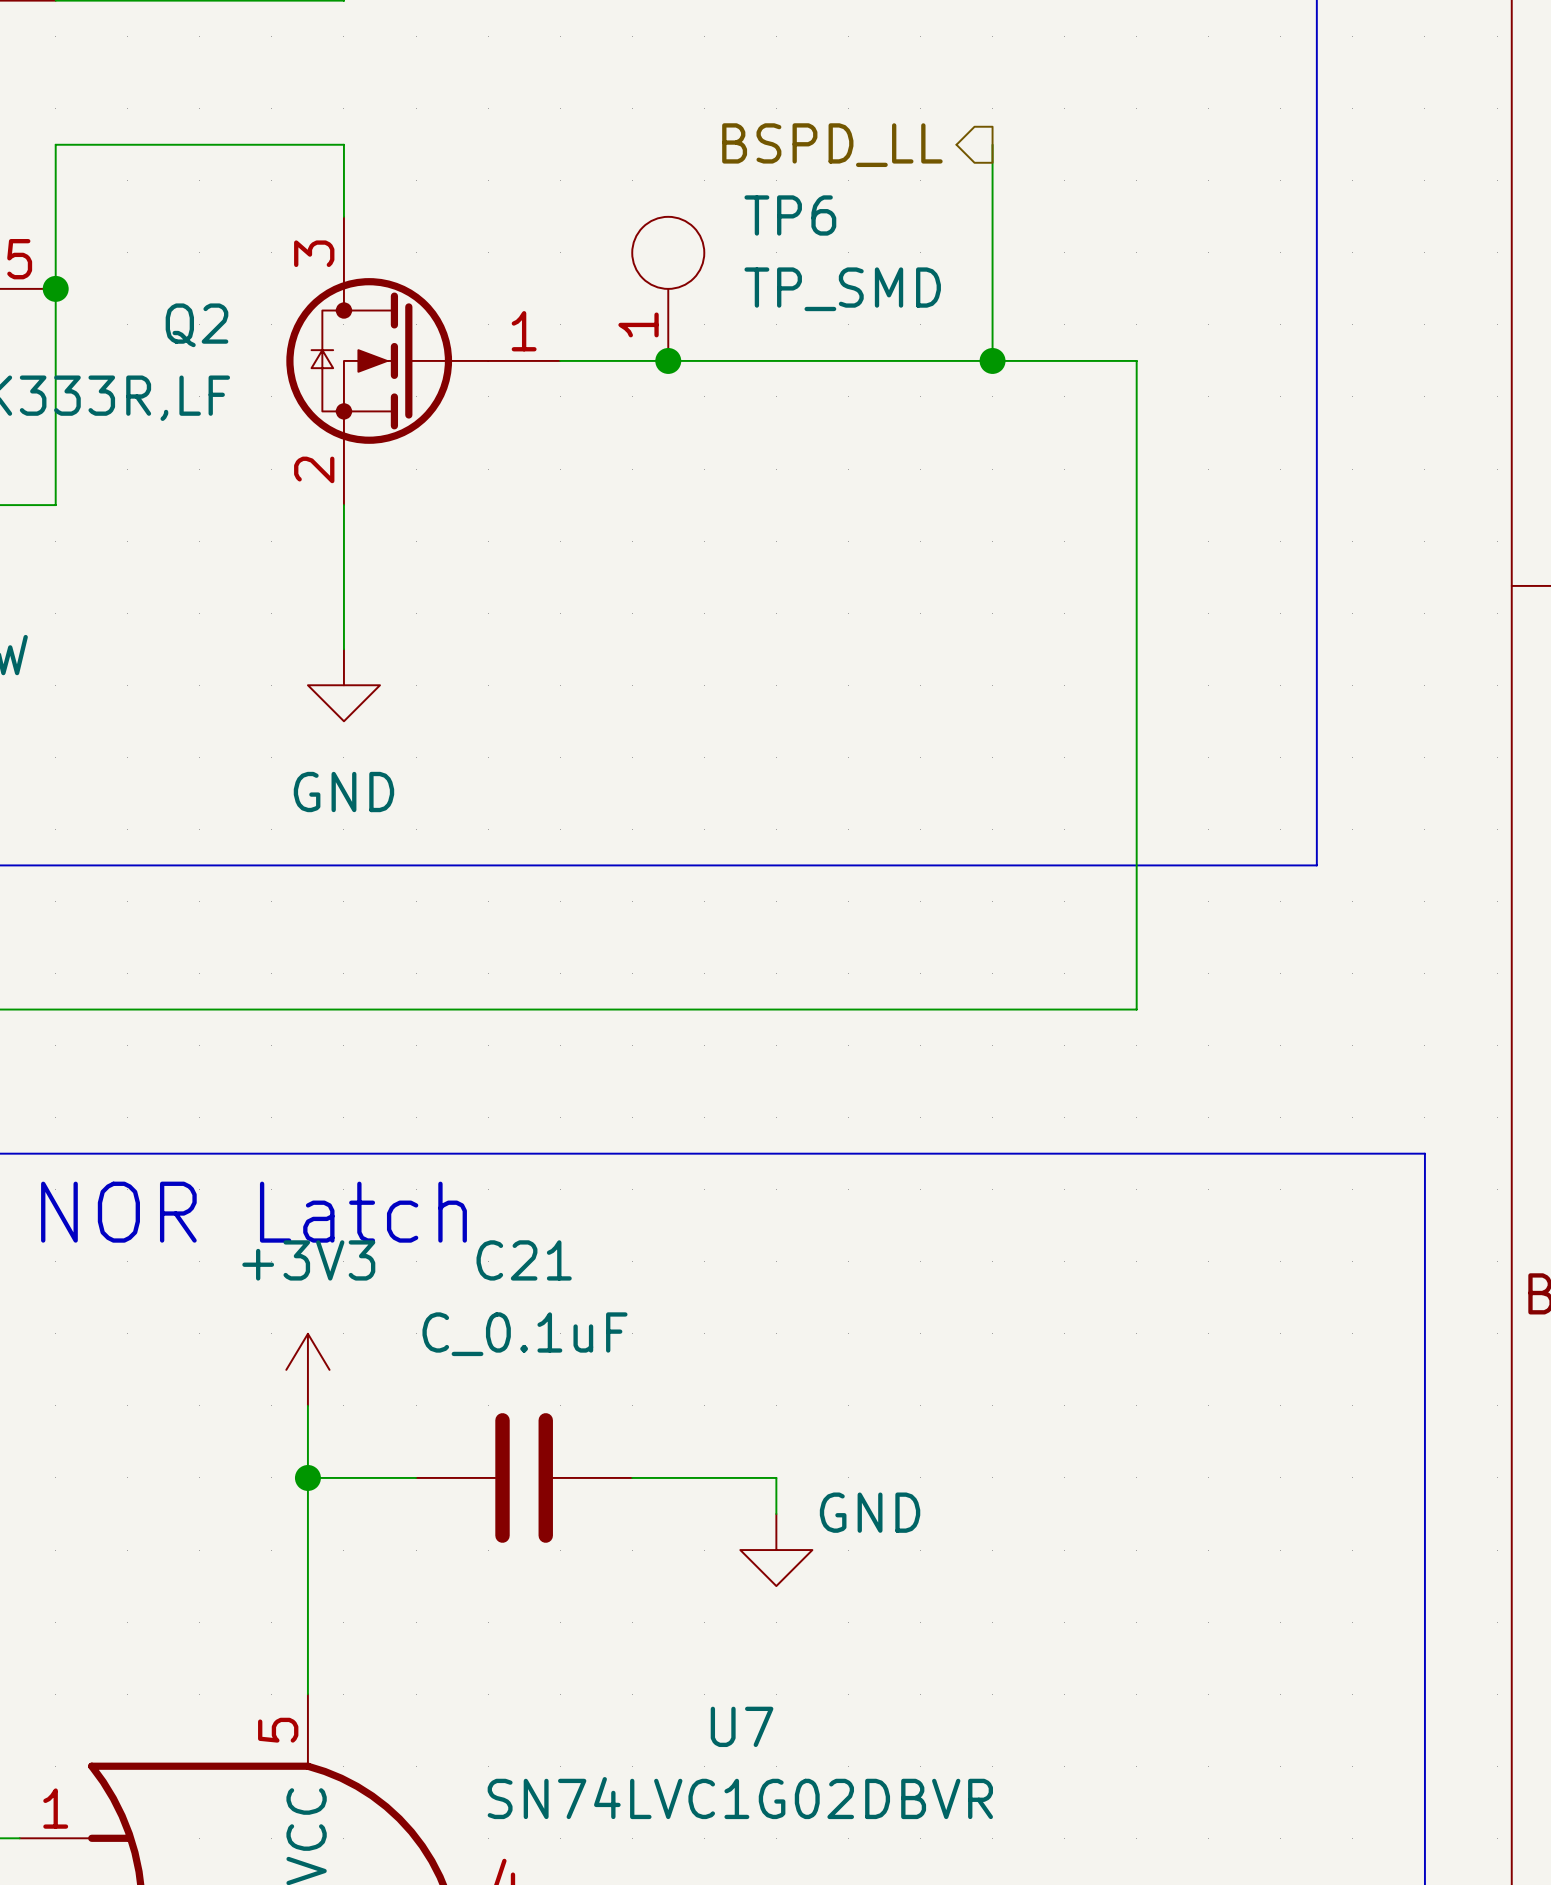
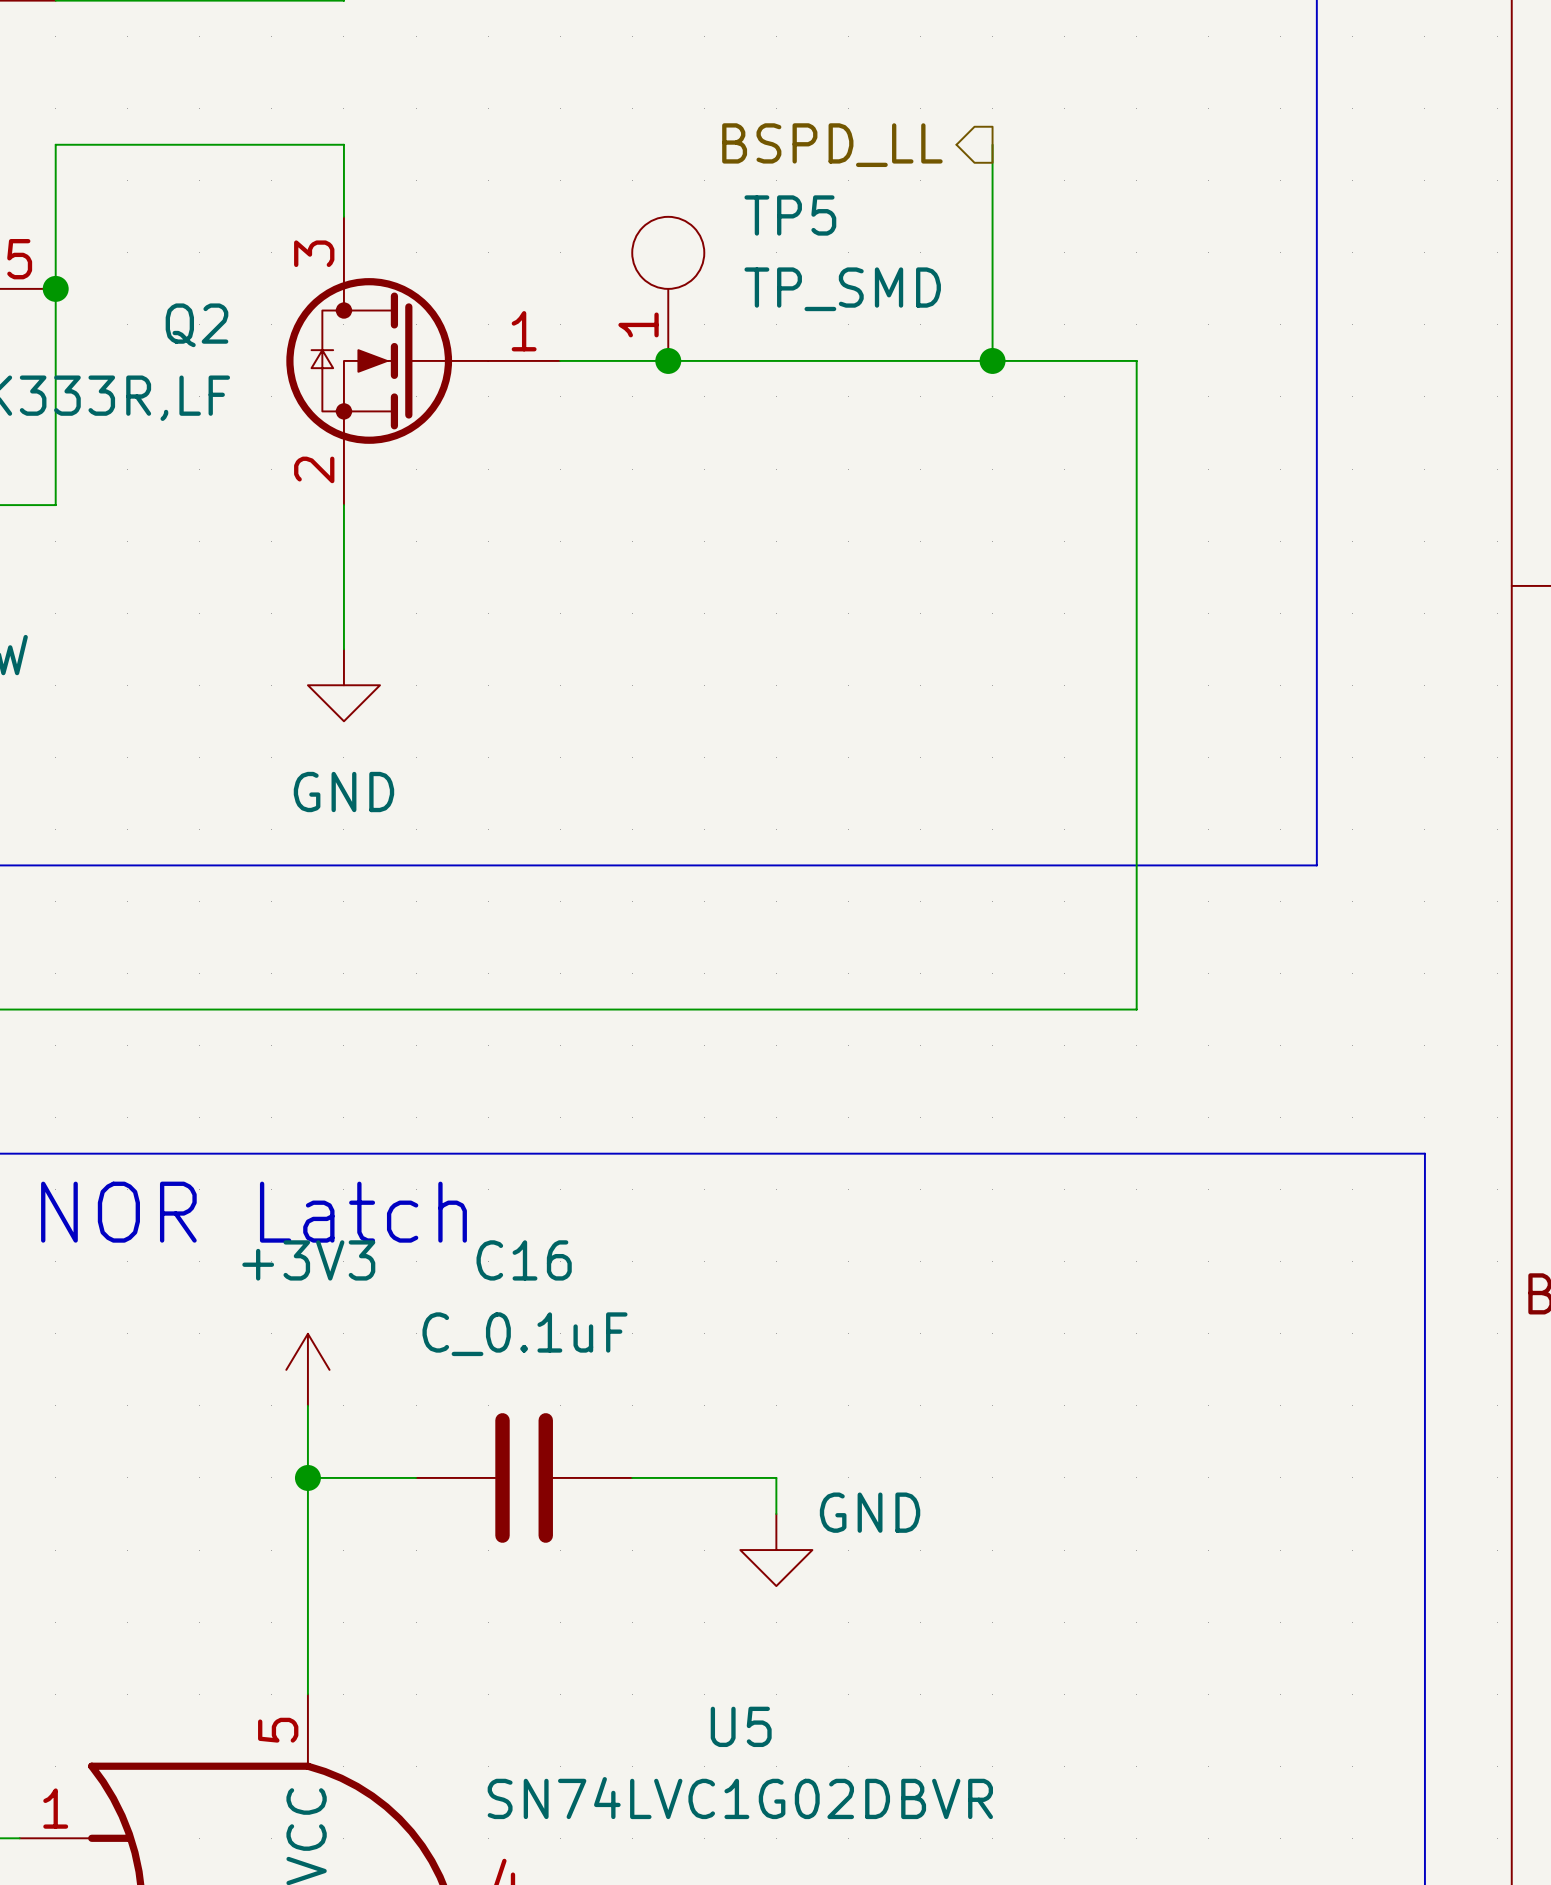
TP6 name: TP6 (790, 215) -> TP5 (790, 215)
C21 name: C21 (524, 1260) -> C16 (524, 1260)
U7 name: U7 (742, 1726) -> U5 (741, 1726)

